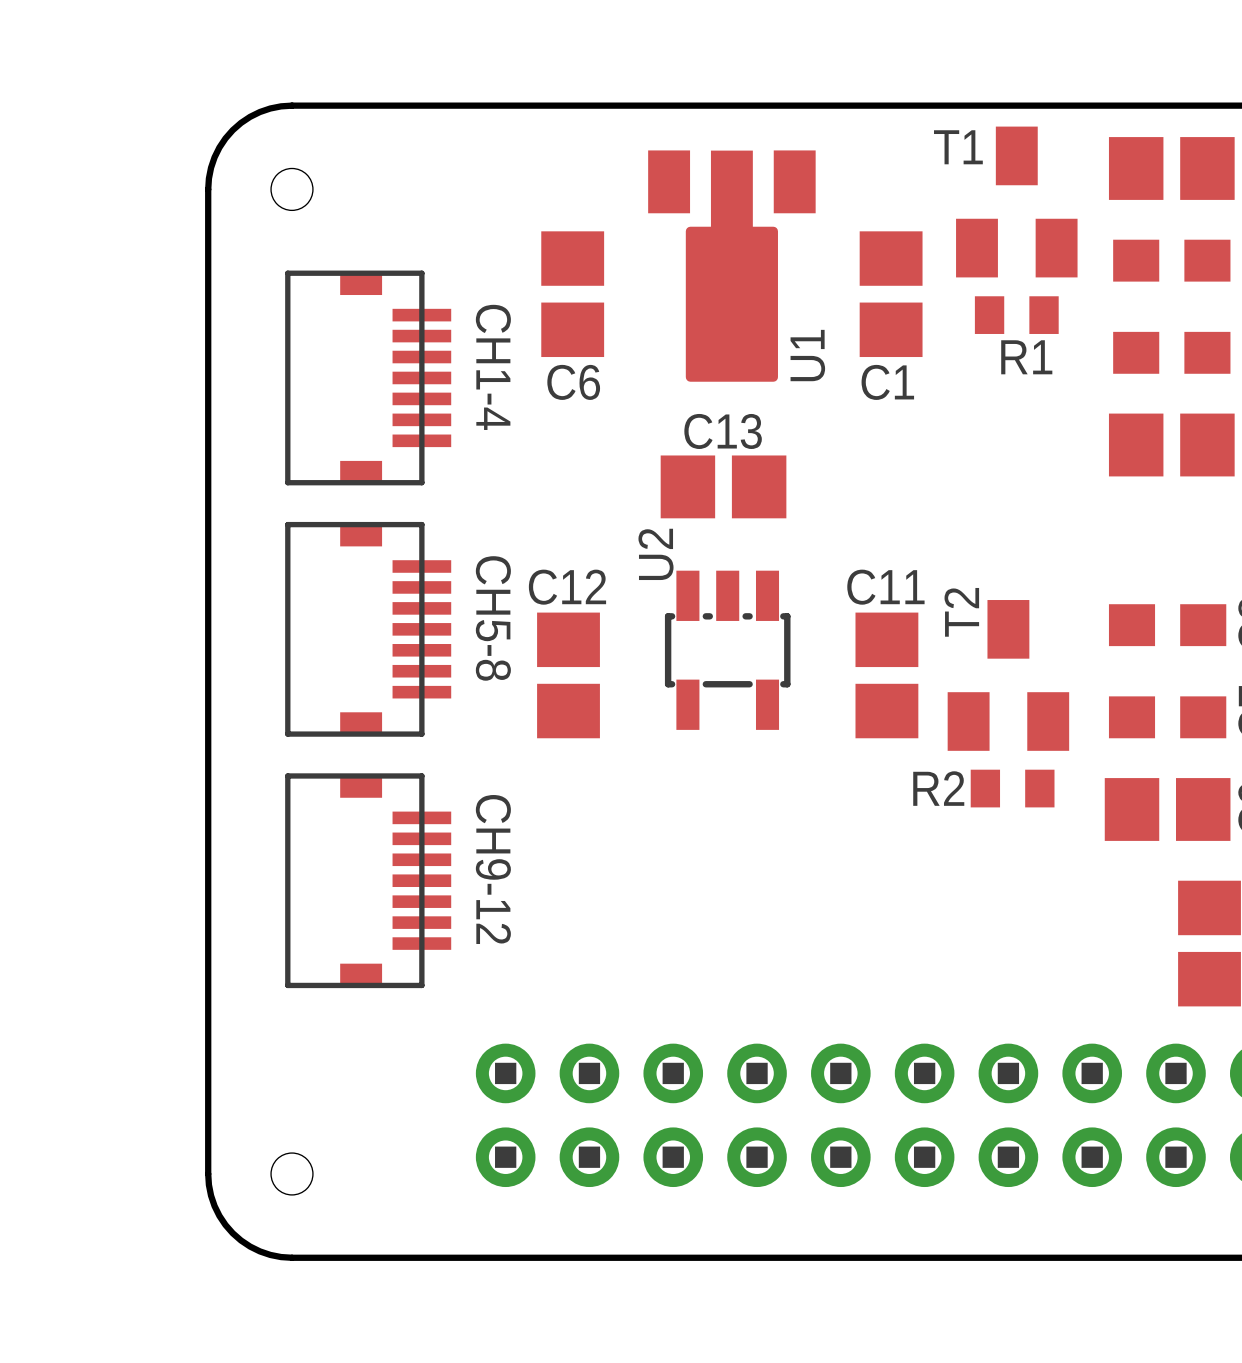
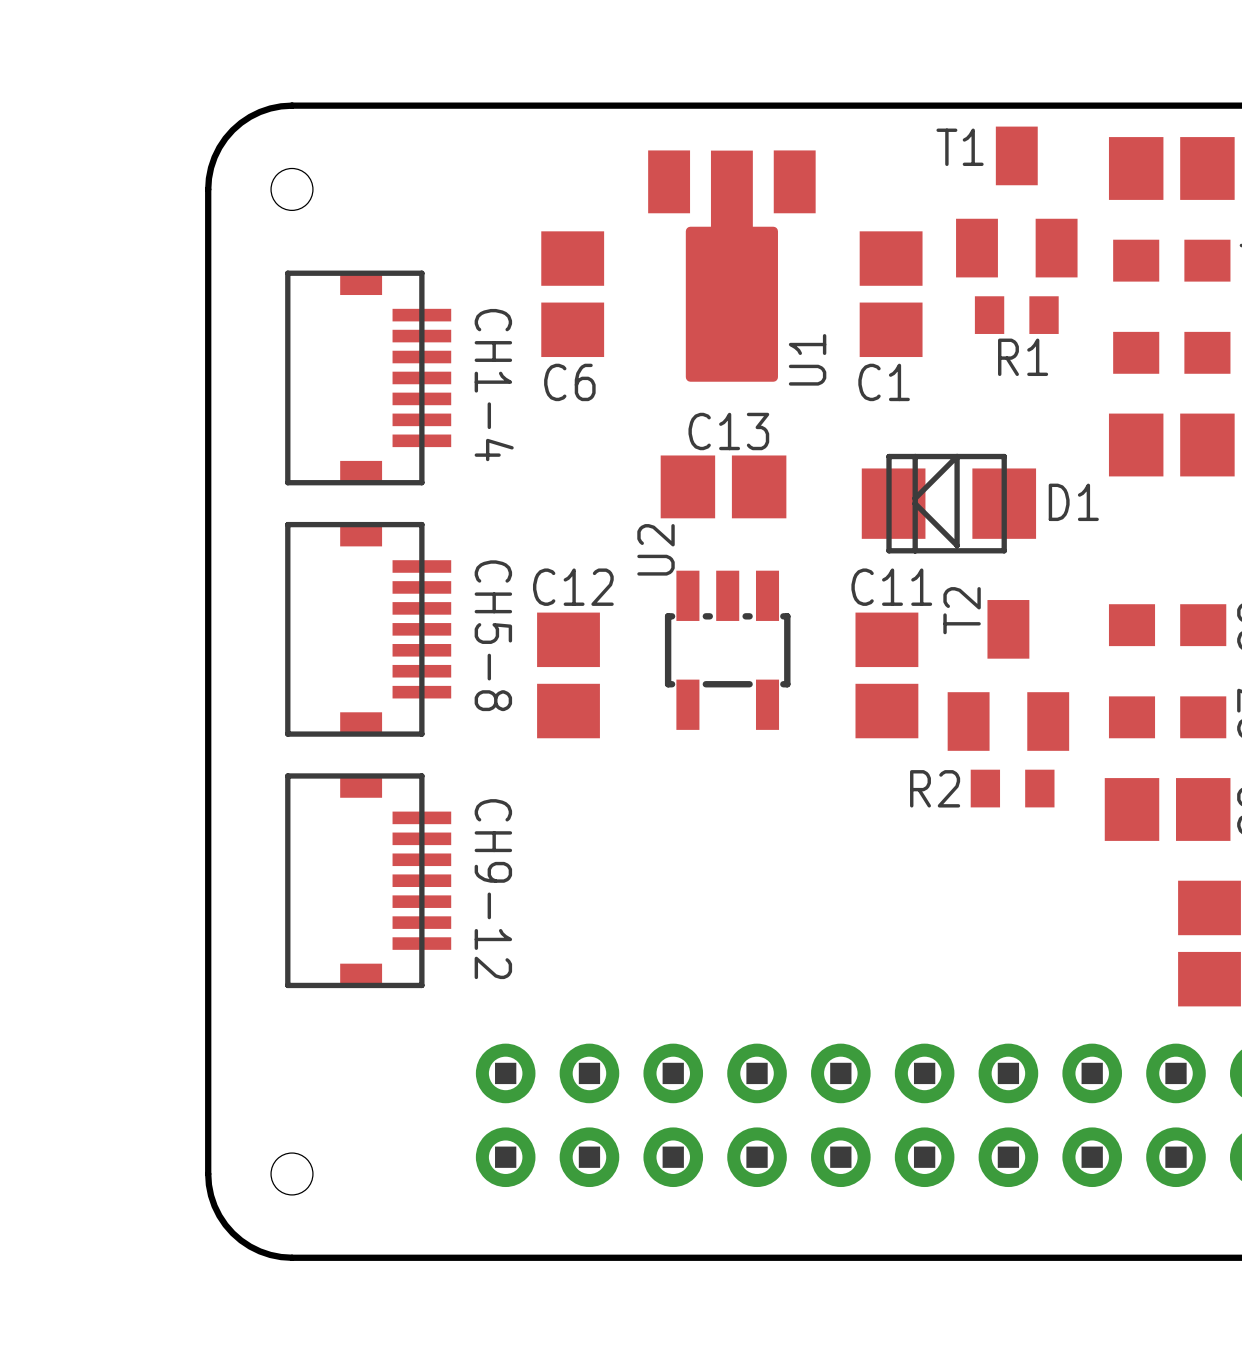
D1: none -> (948, 503)

